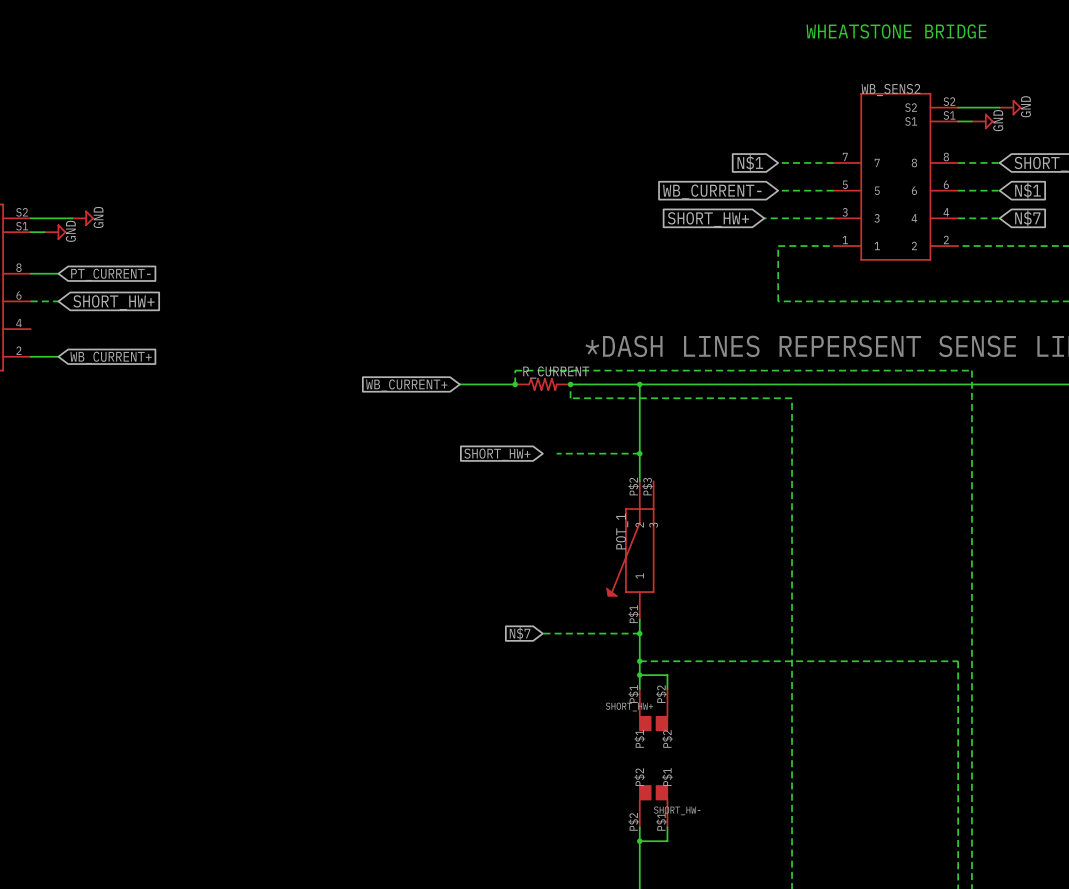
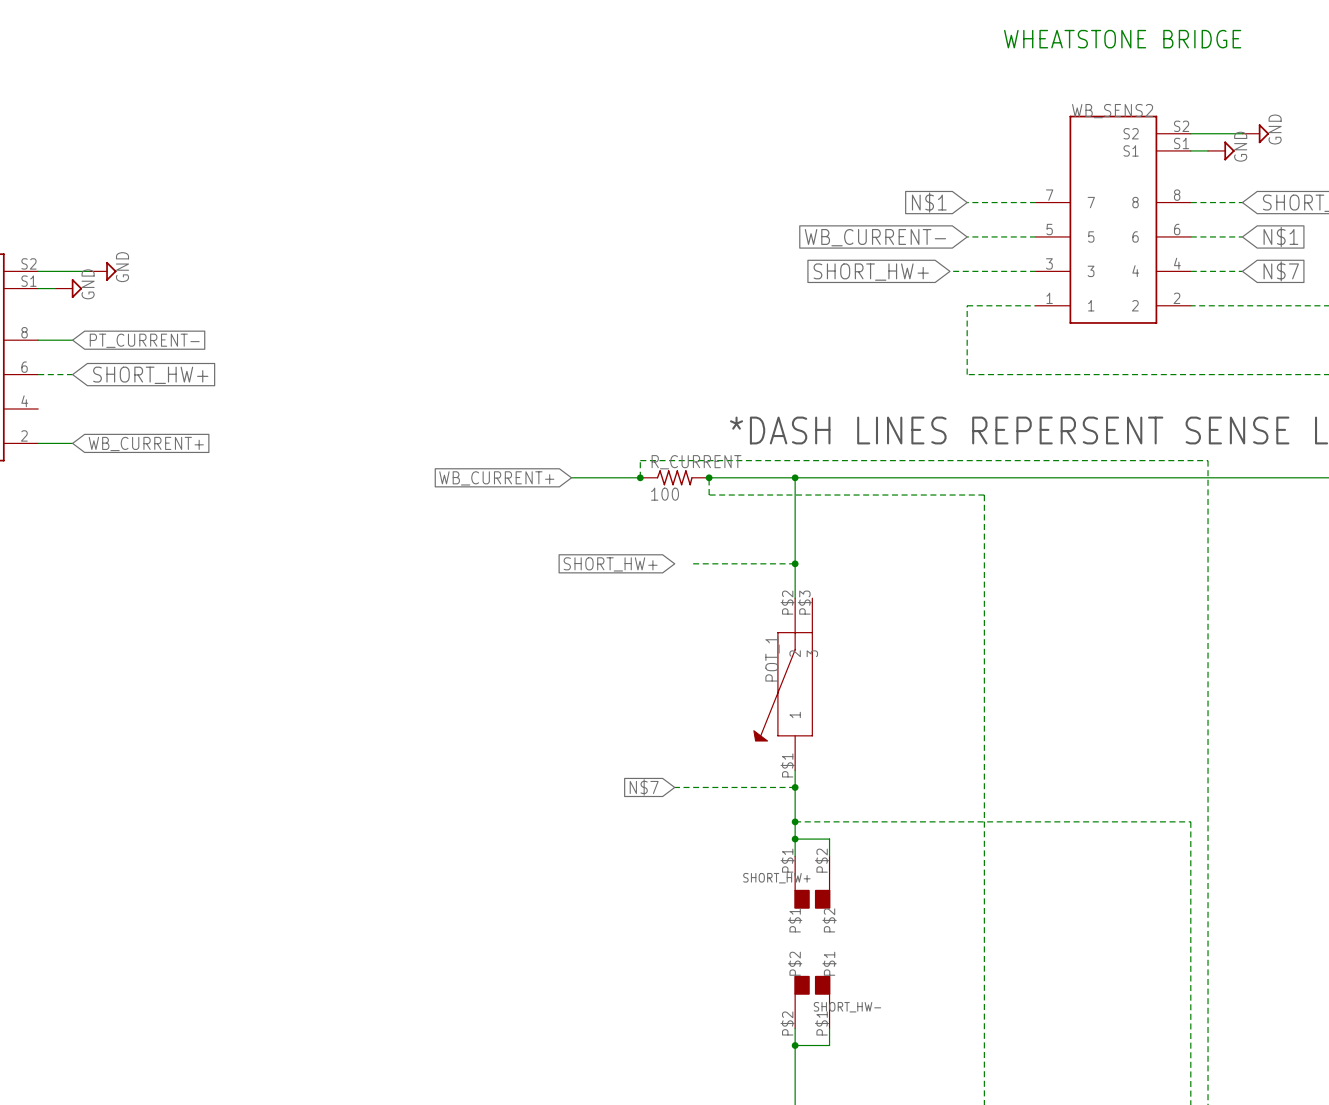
R_CURRENT value: none -> 100 (665, 494)

